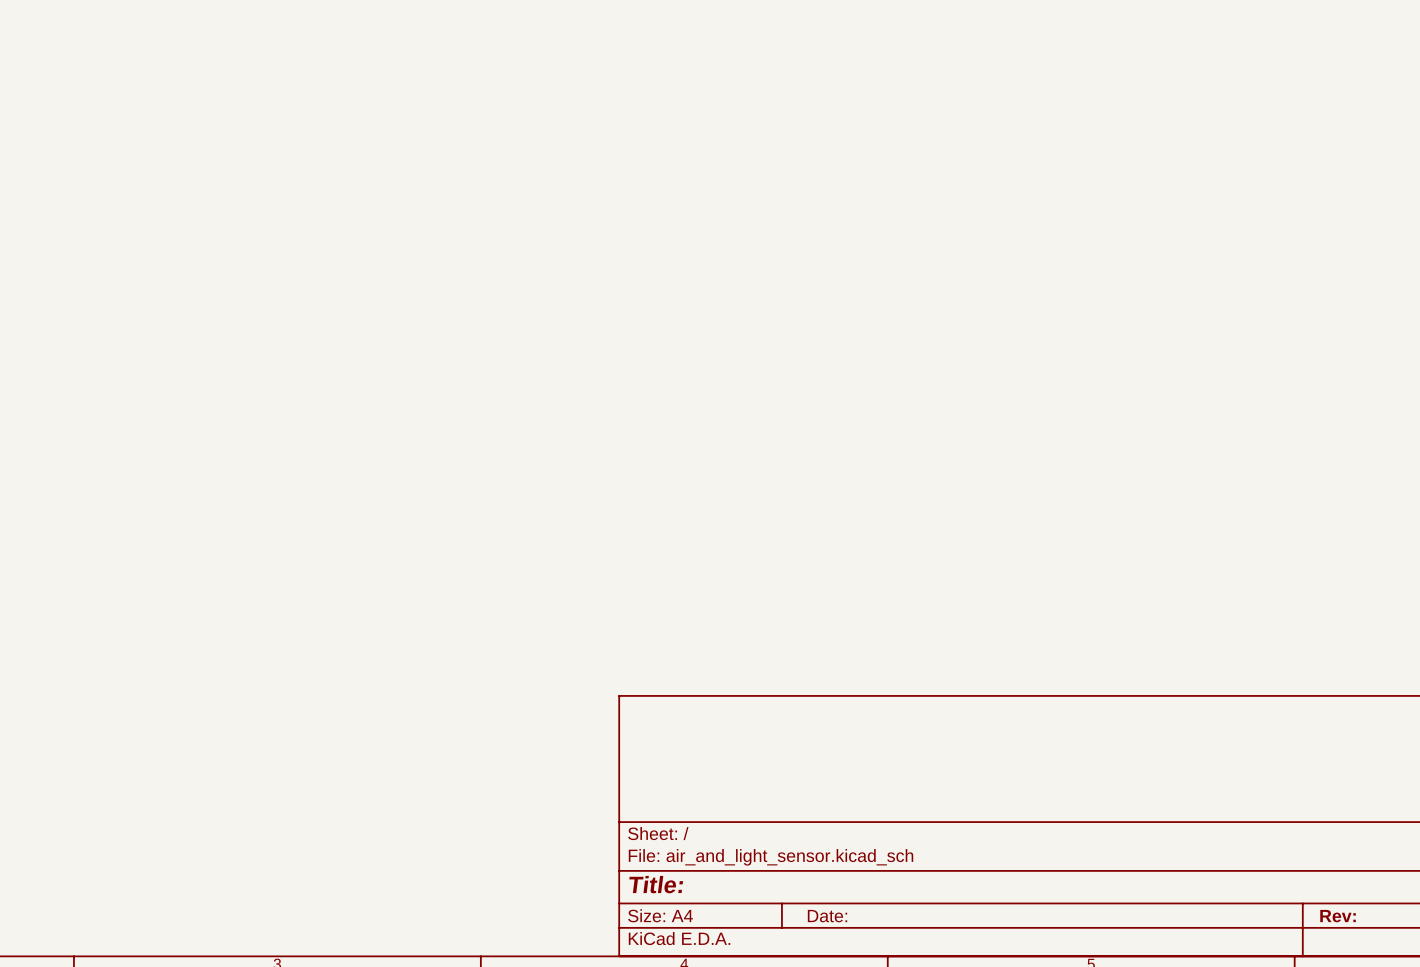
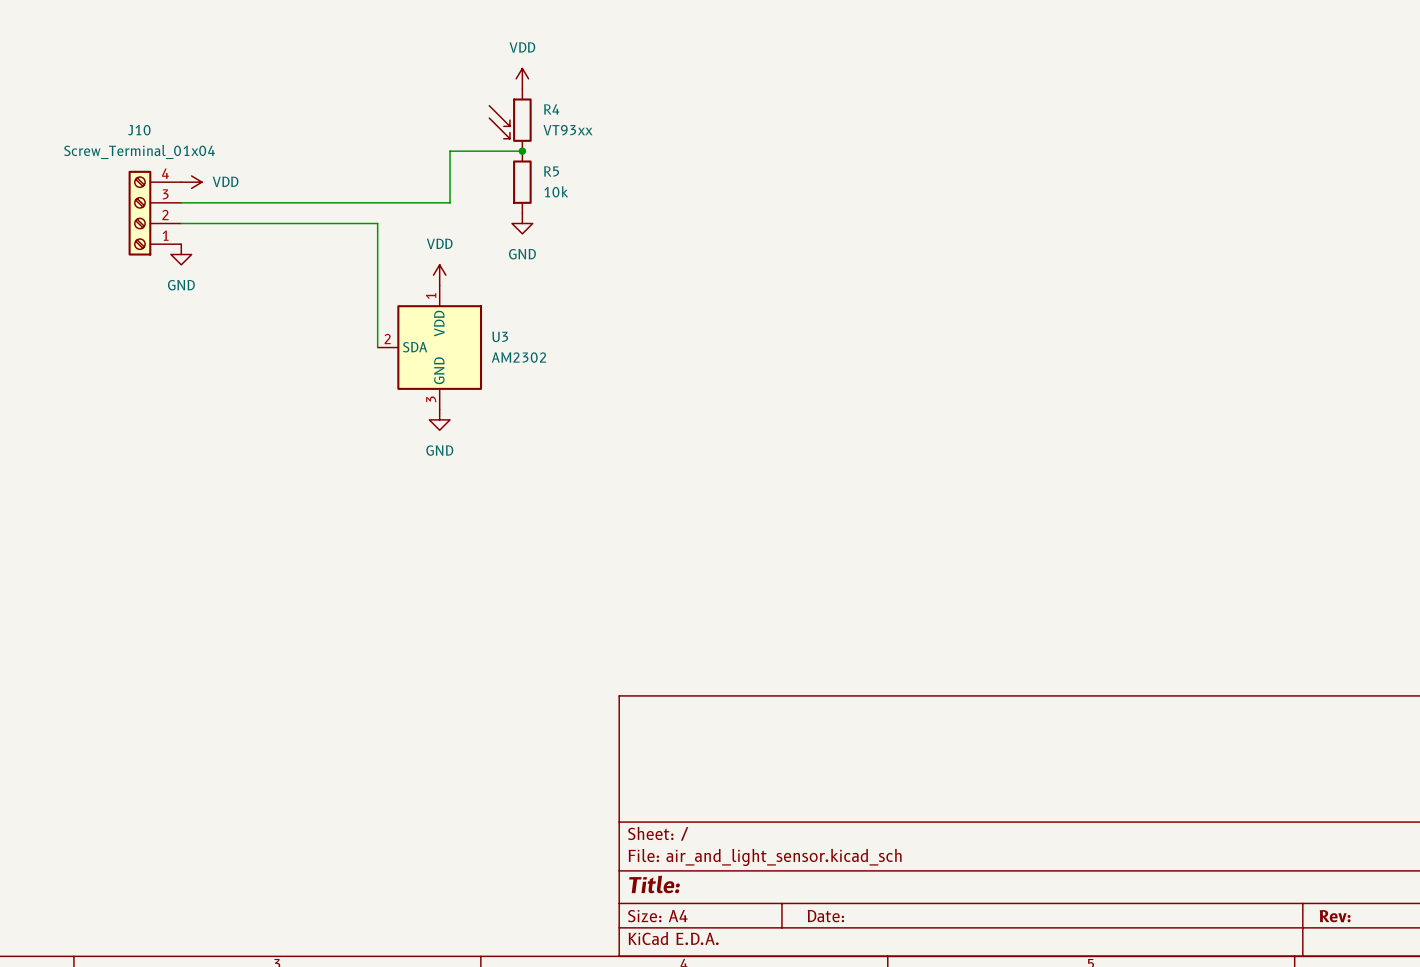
power symbol: none -> VDD (522, 78)
R4: none -> VT93xx (510, 120)
wire: none -> (522, 151) (450, 151) (450, 202) (181, 202)
junction: none -> (522, 151)
power symbol: none -> VDD (191, 182)
R5: none -> 10k (522, 182)
J10: none -> Screw_Terminal_01x04 (154, 213)
wire: none -> (181, 223) (377, 223) (377, 347)
power symbol: none -> GND (522, 223)
power symbol: none -> GND (181, 254)
power symbol: none -> VDD (439, 275)
U3: none -> AM2302 (429, 347)
power symbol: none -> GND (439, 419)

